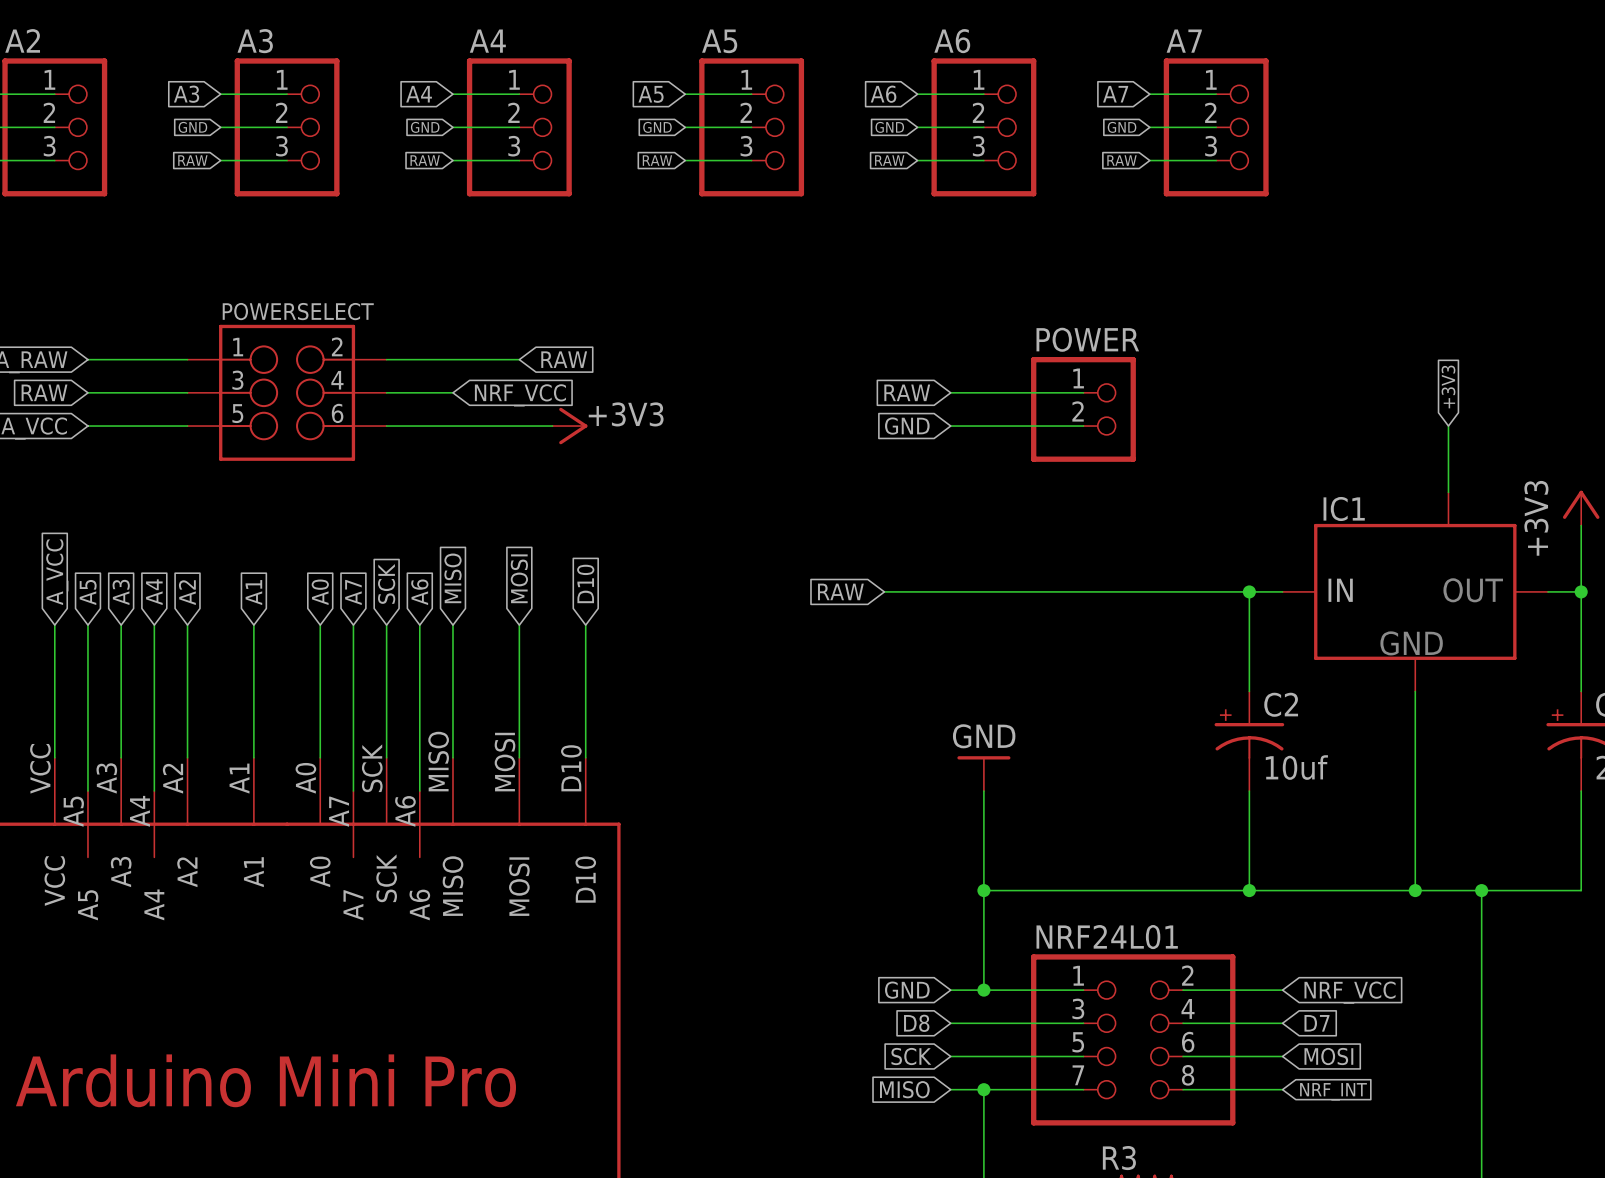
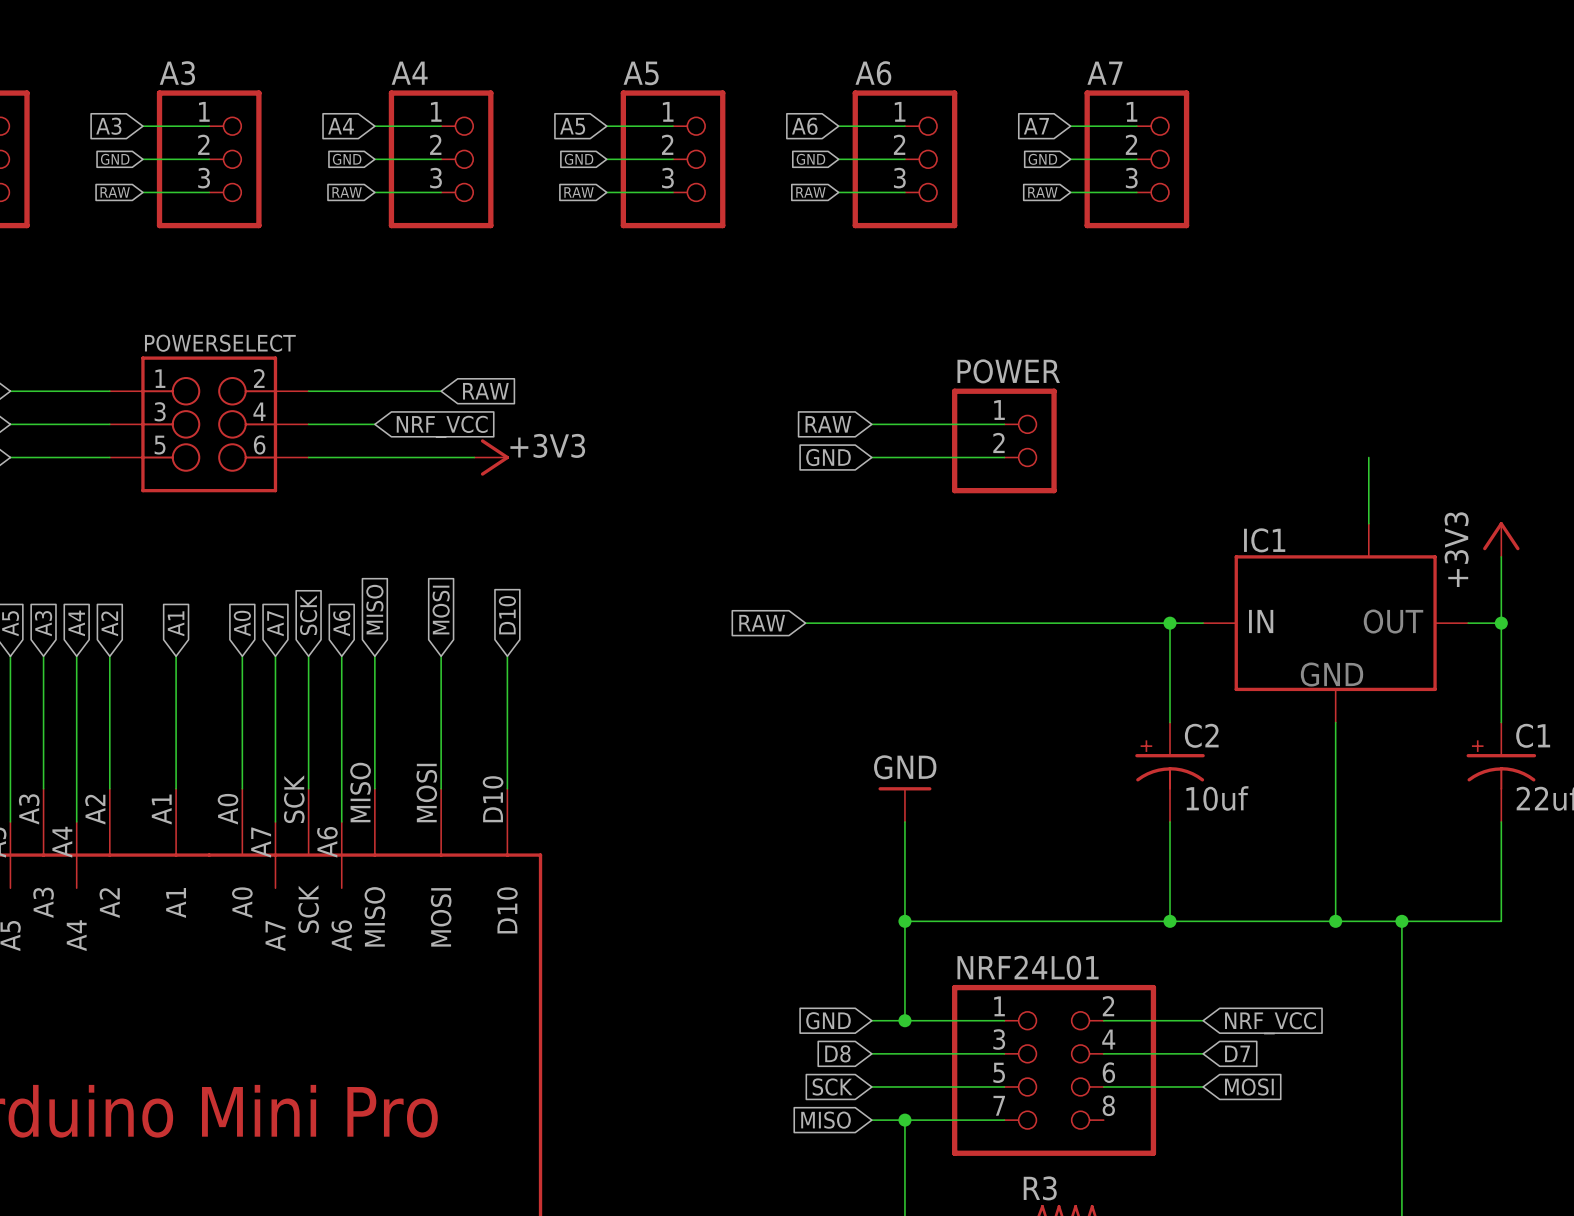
global label: +3V3 (1448, 386) -> none
wire: (1183, 1089) (1282, 1089) -> none
global label: NRF_INT (1333, 1091) -> none

